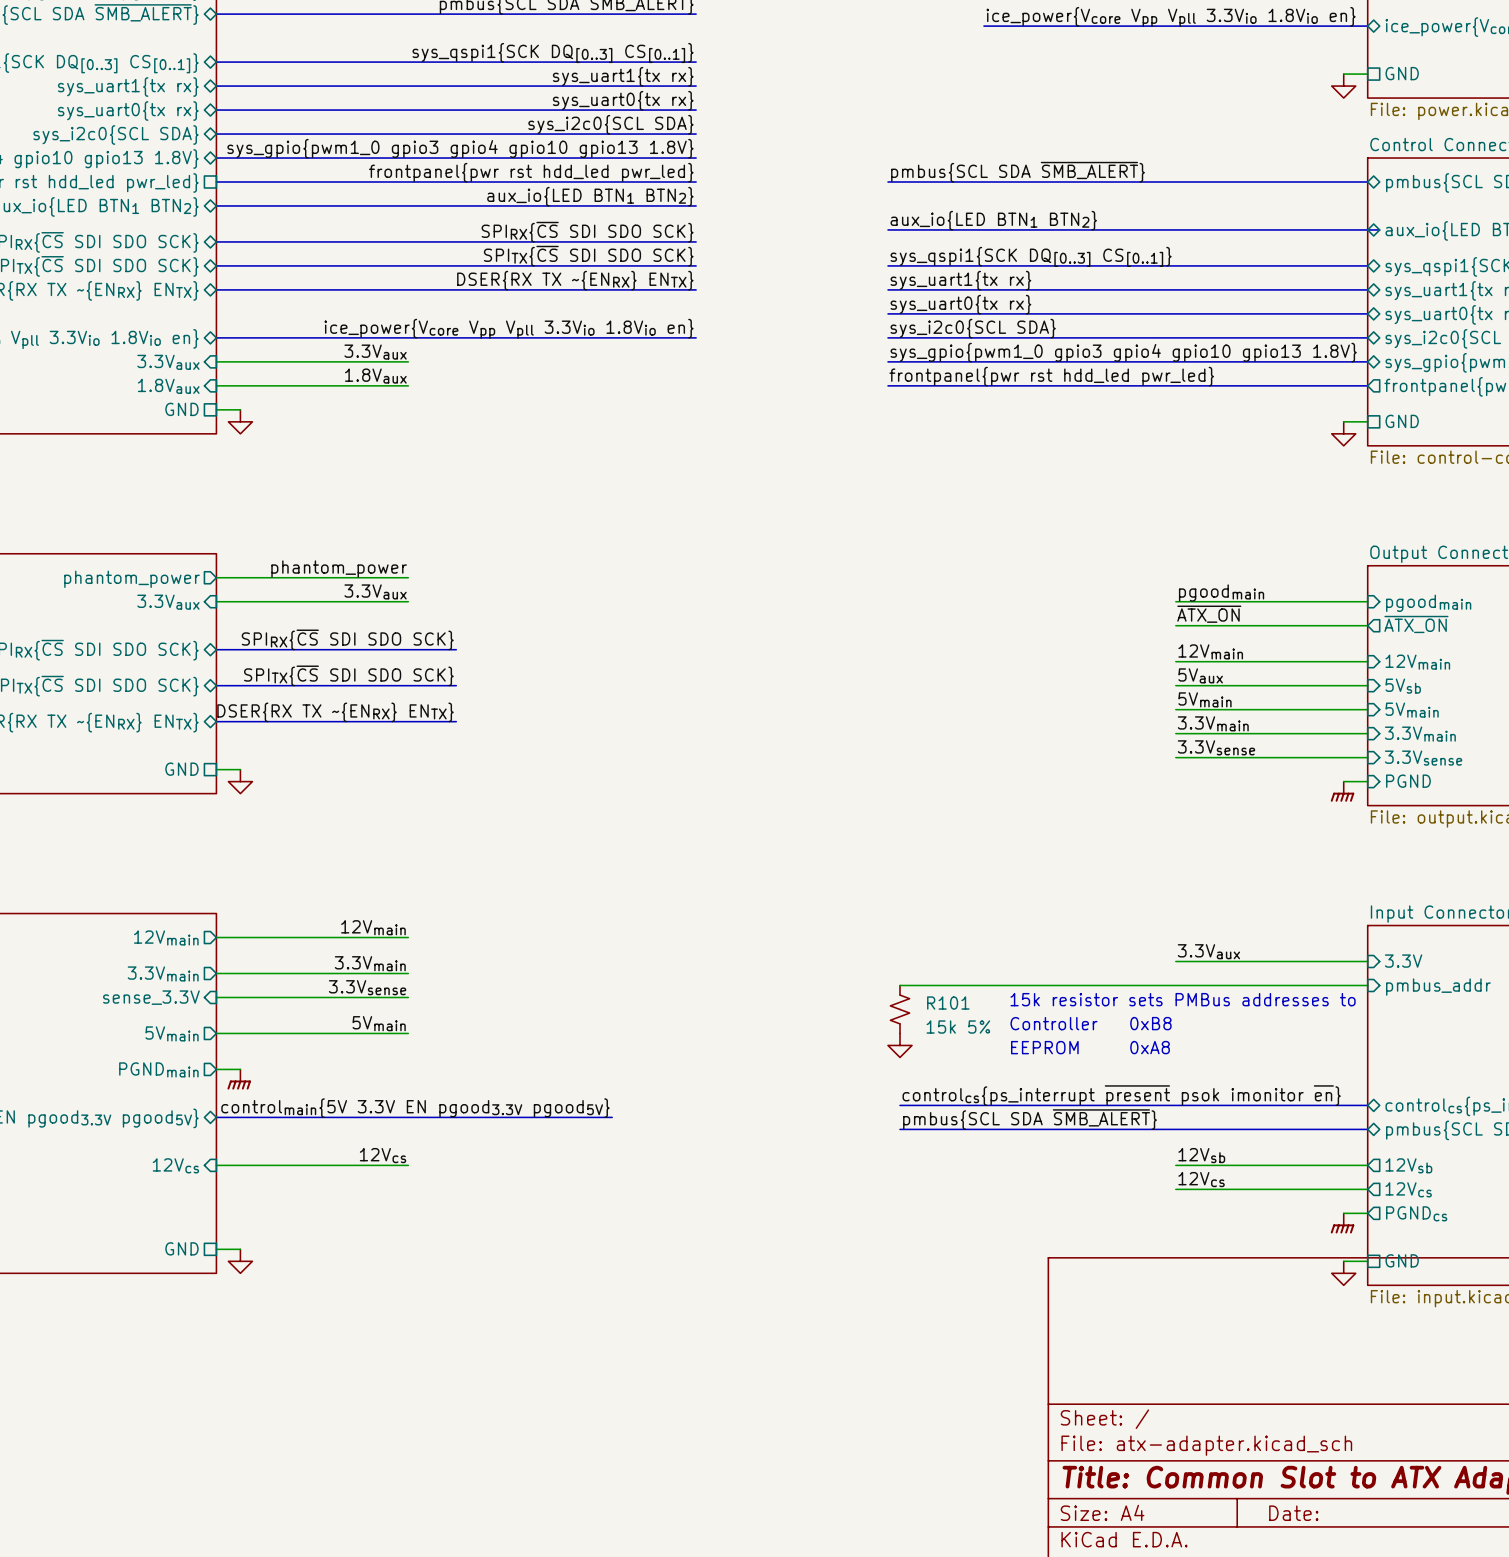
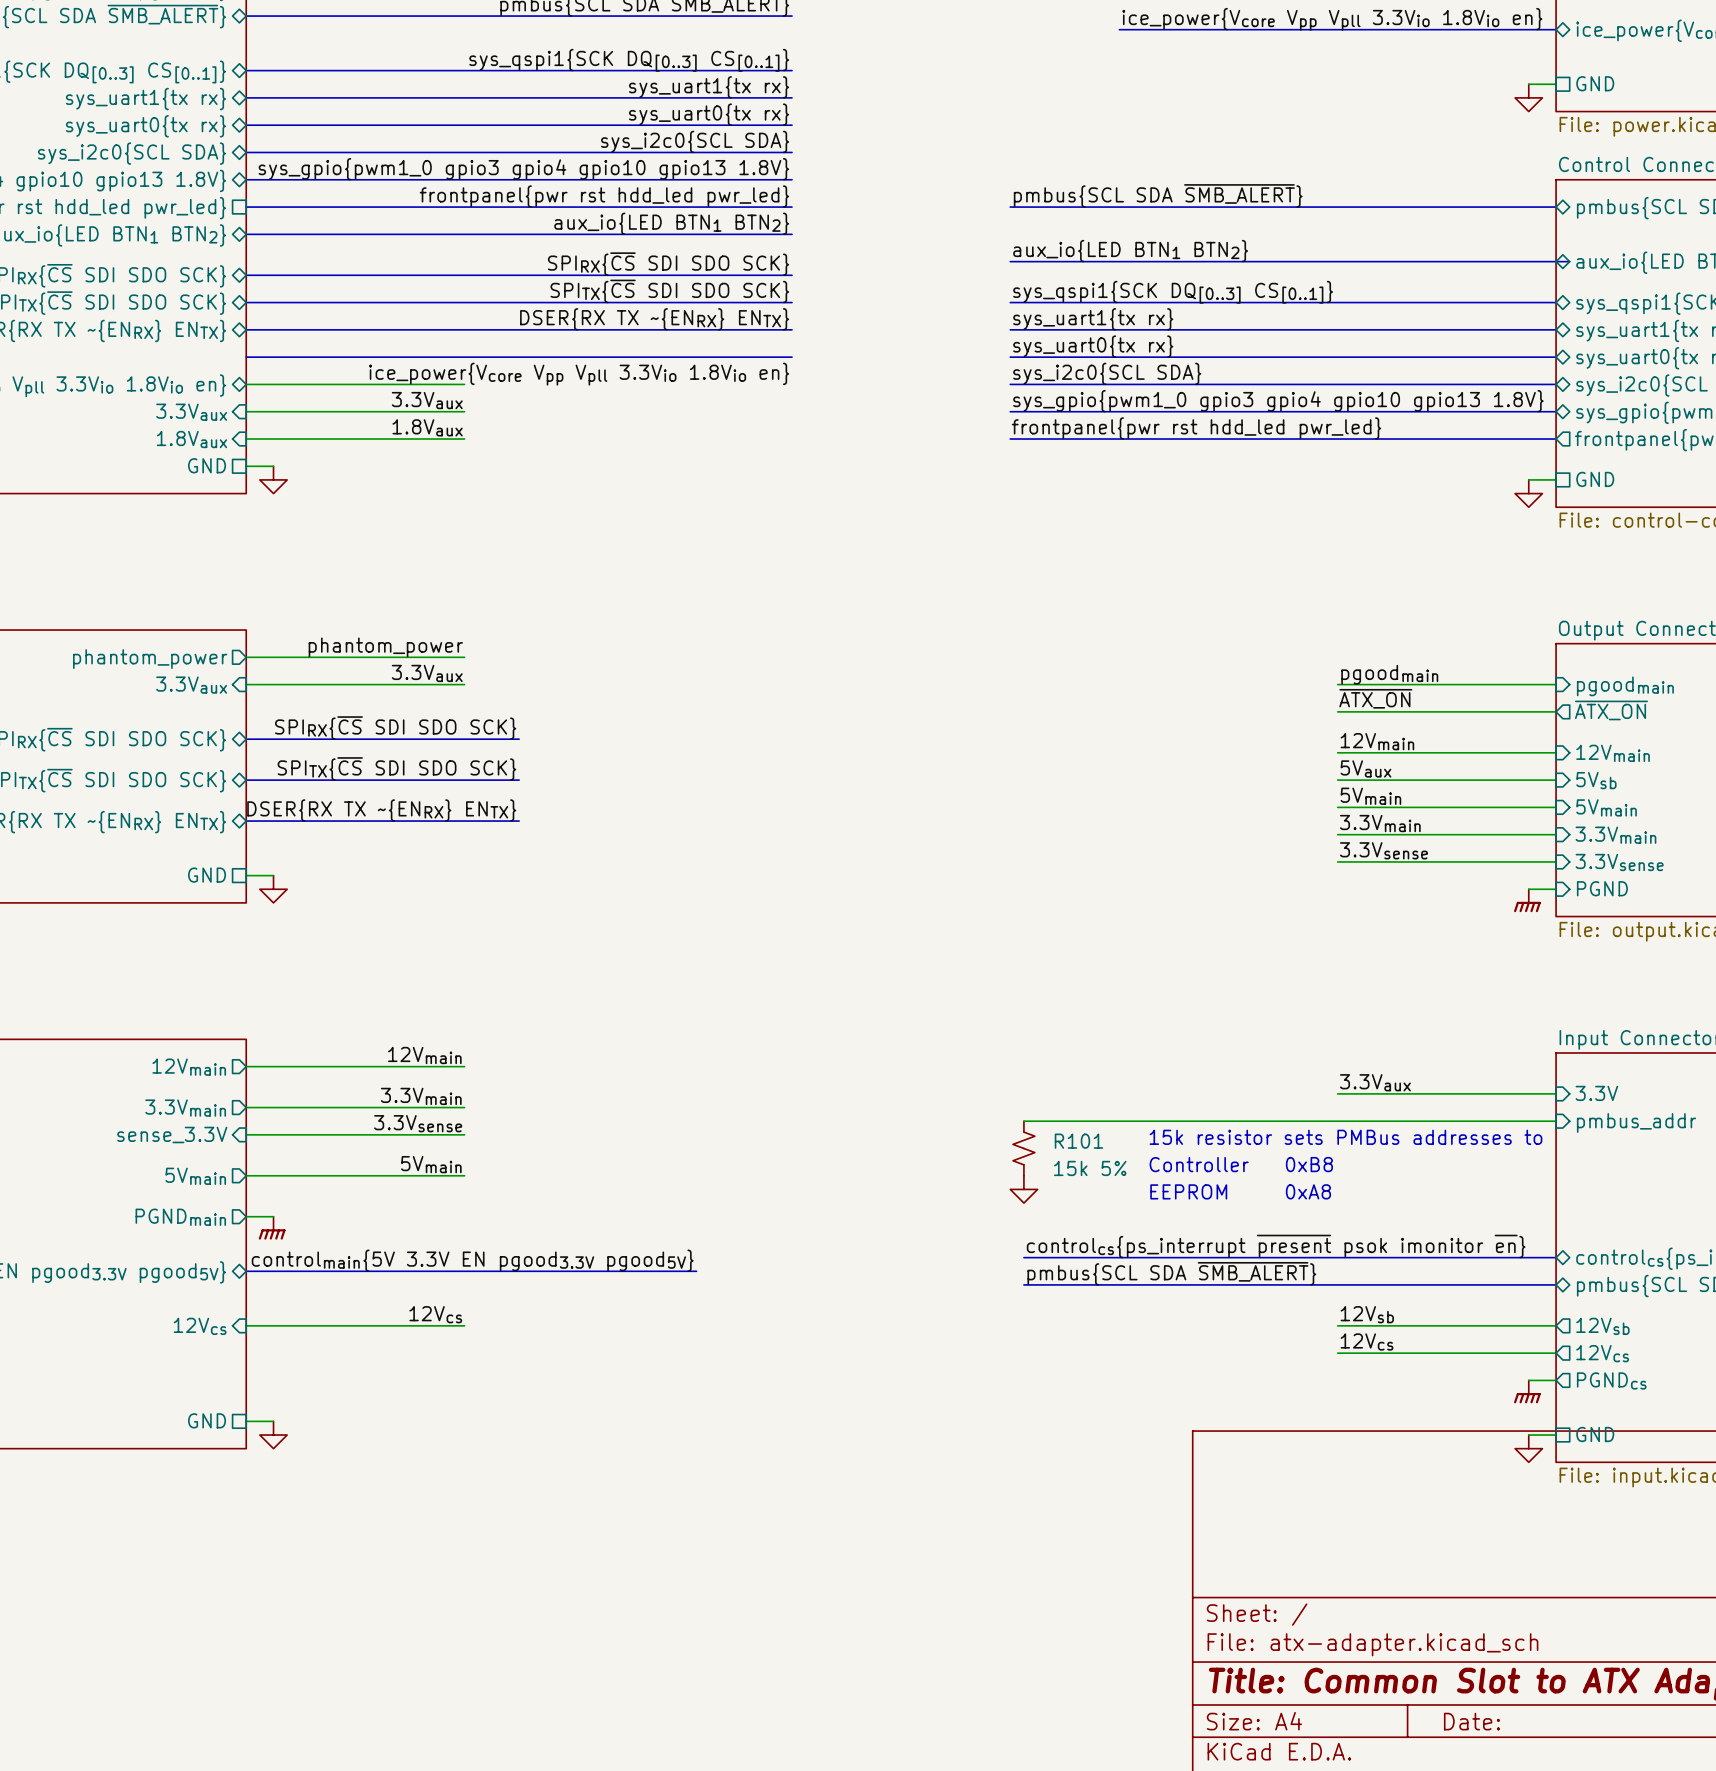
bus: (216, 337) (696, 337) -> (246, 357) (791, 357)

